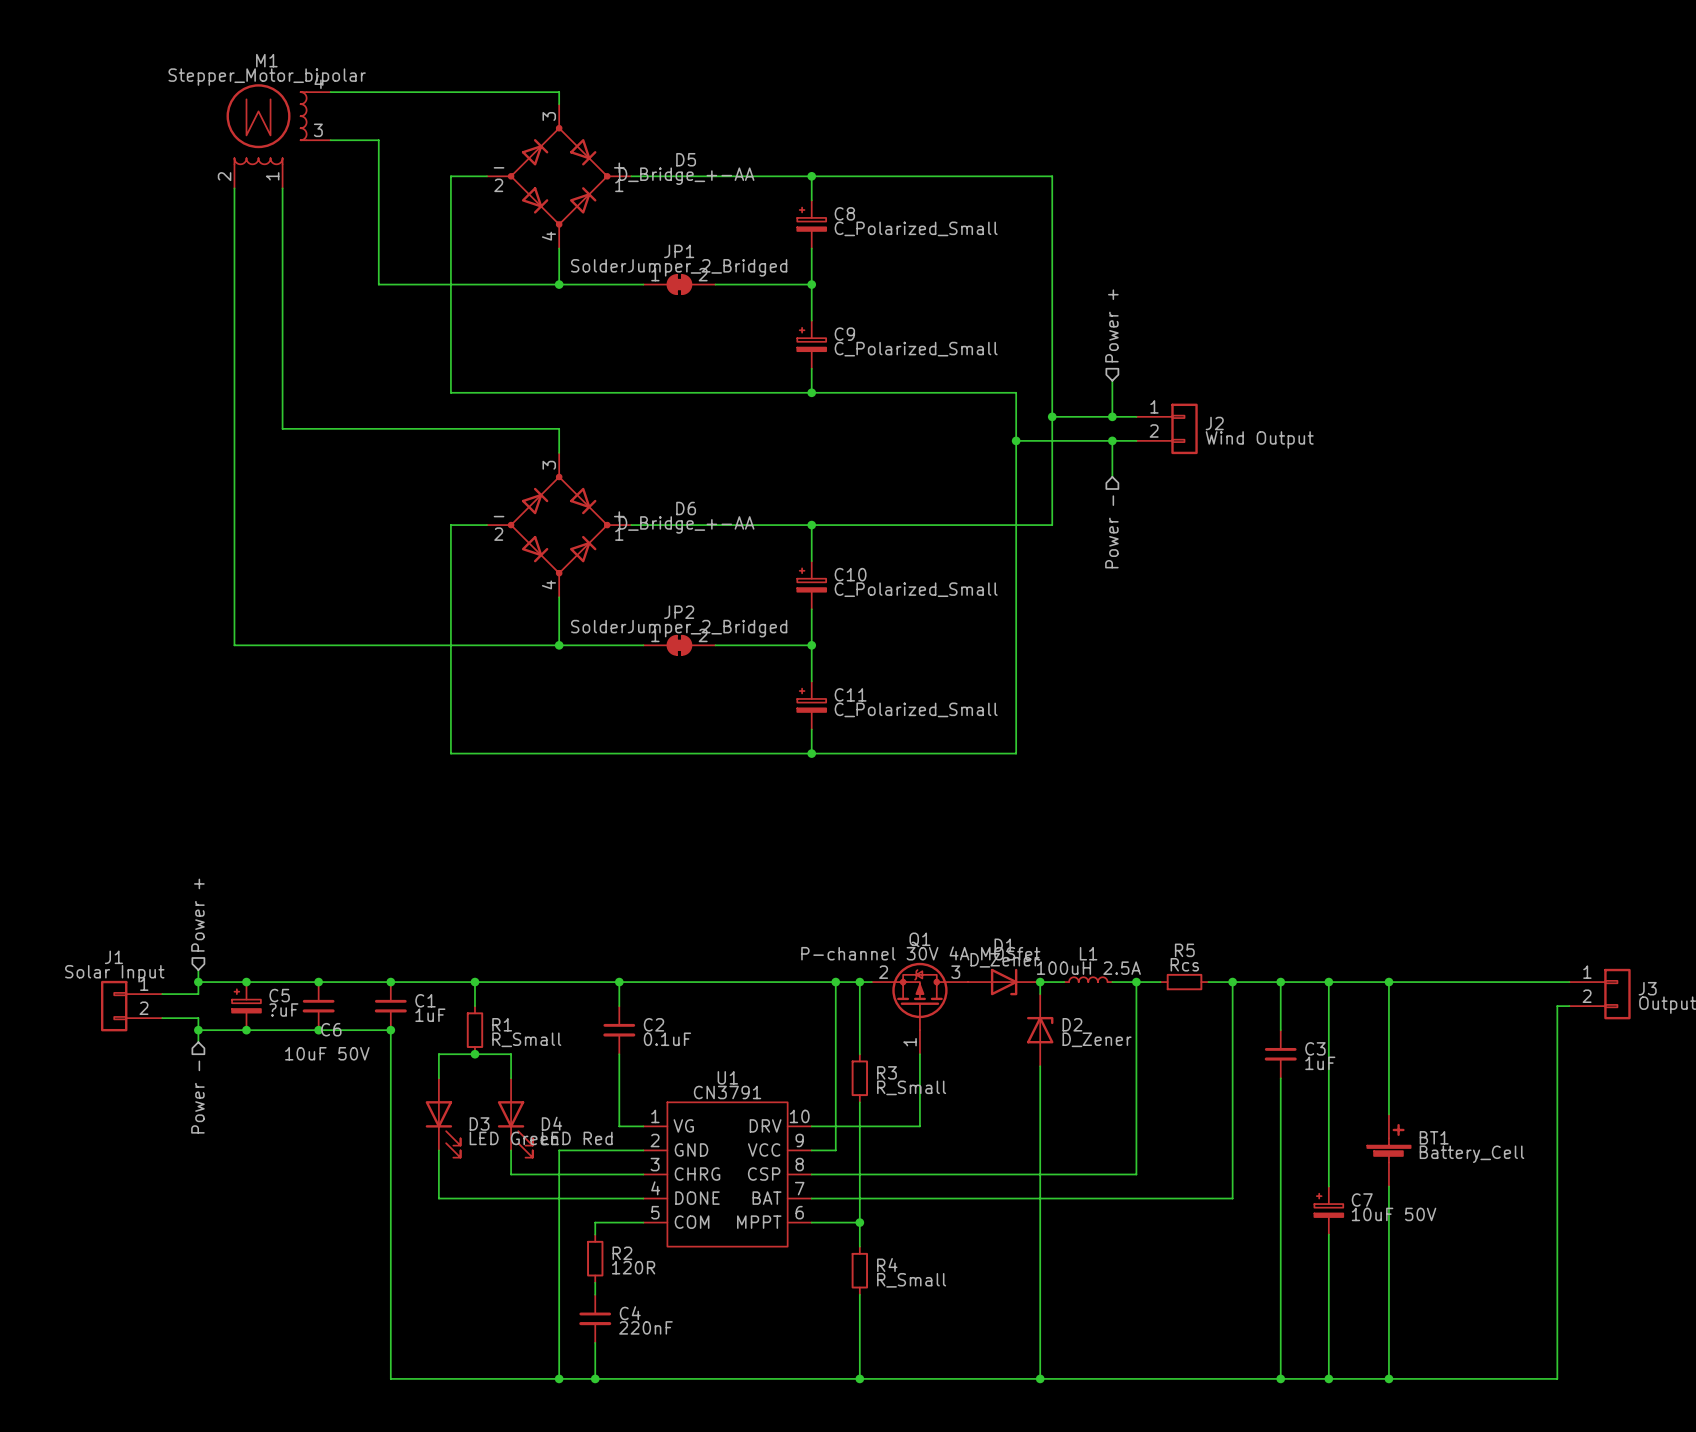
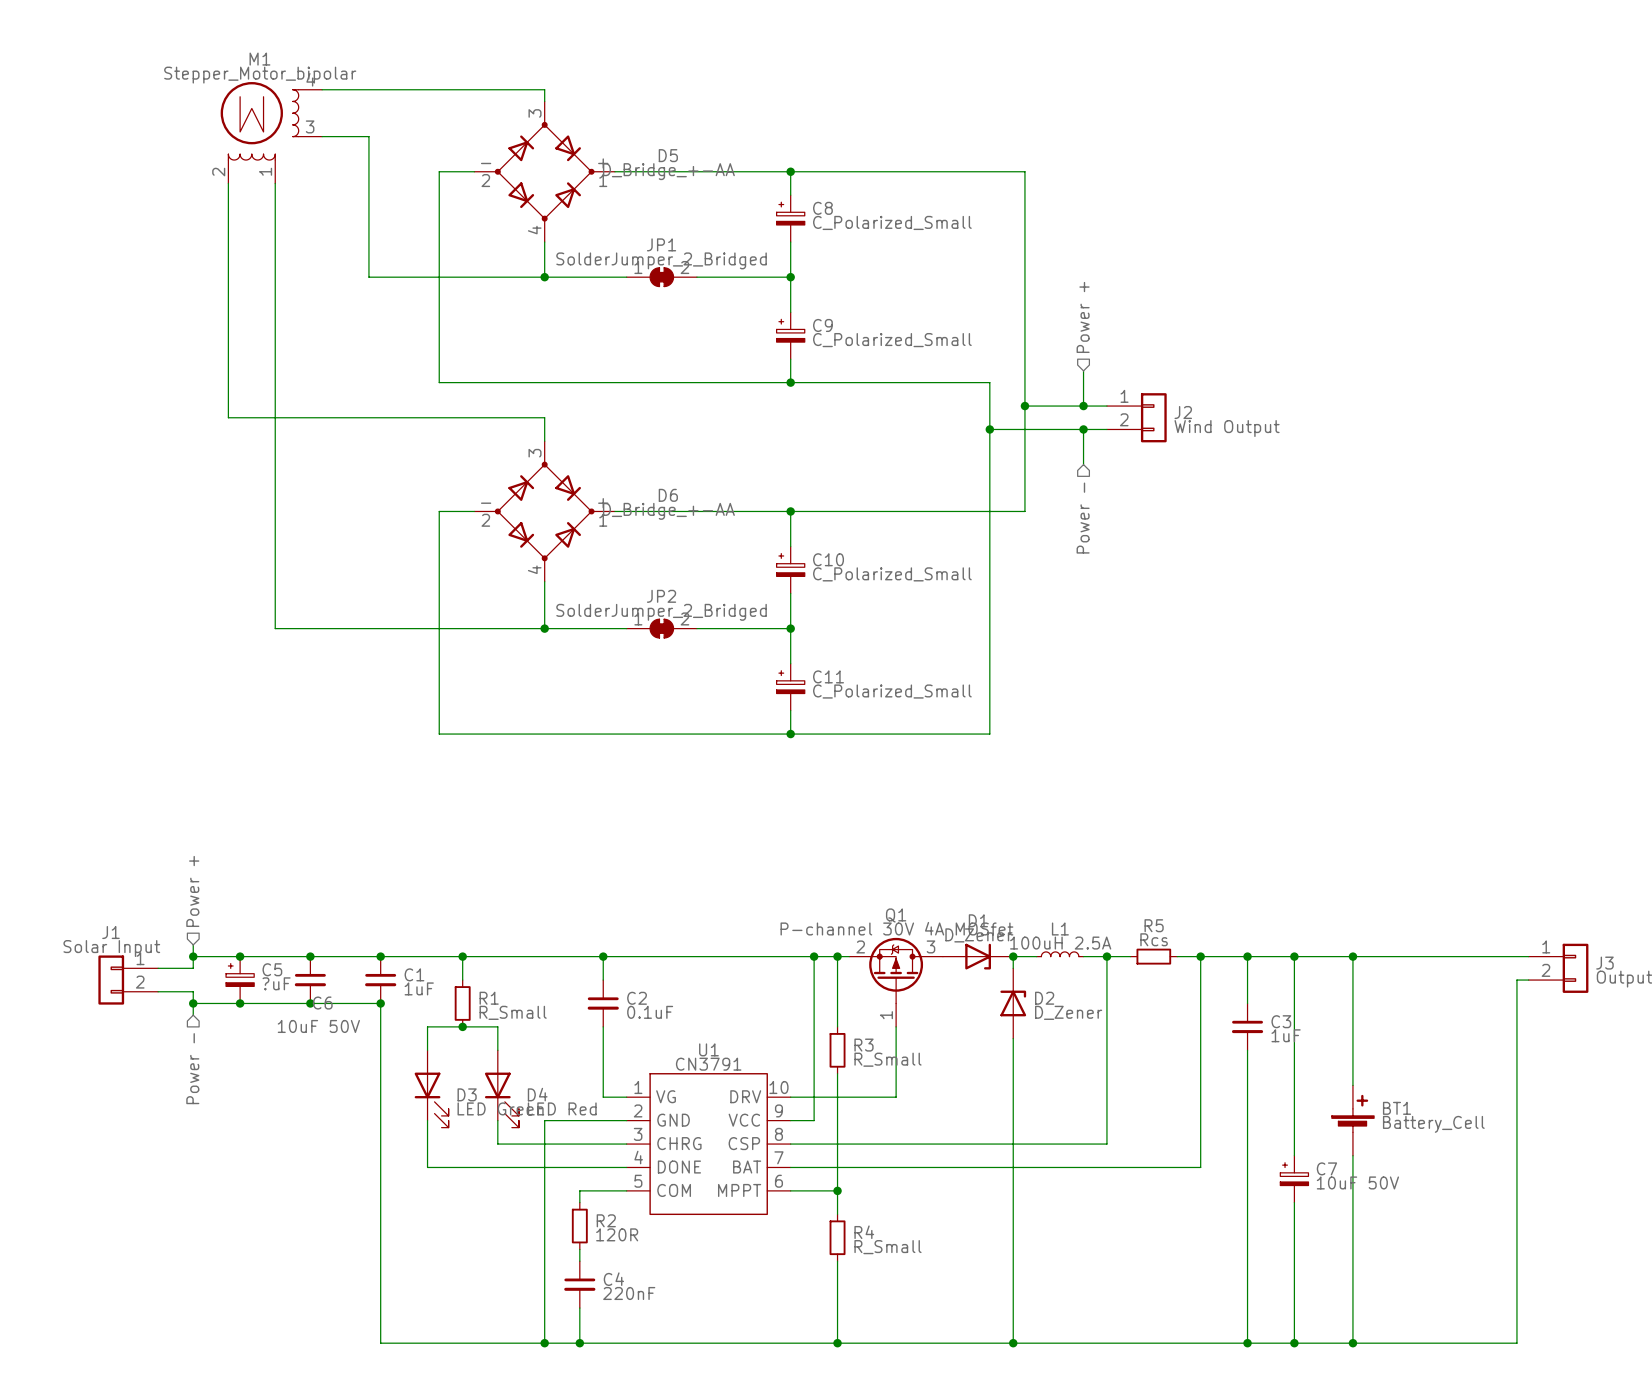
wire: (234, 428) (234, 645) (282, 645) -> (228, 417) (275, 417) (275, 628)

